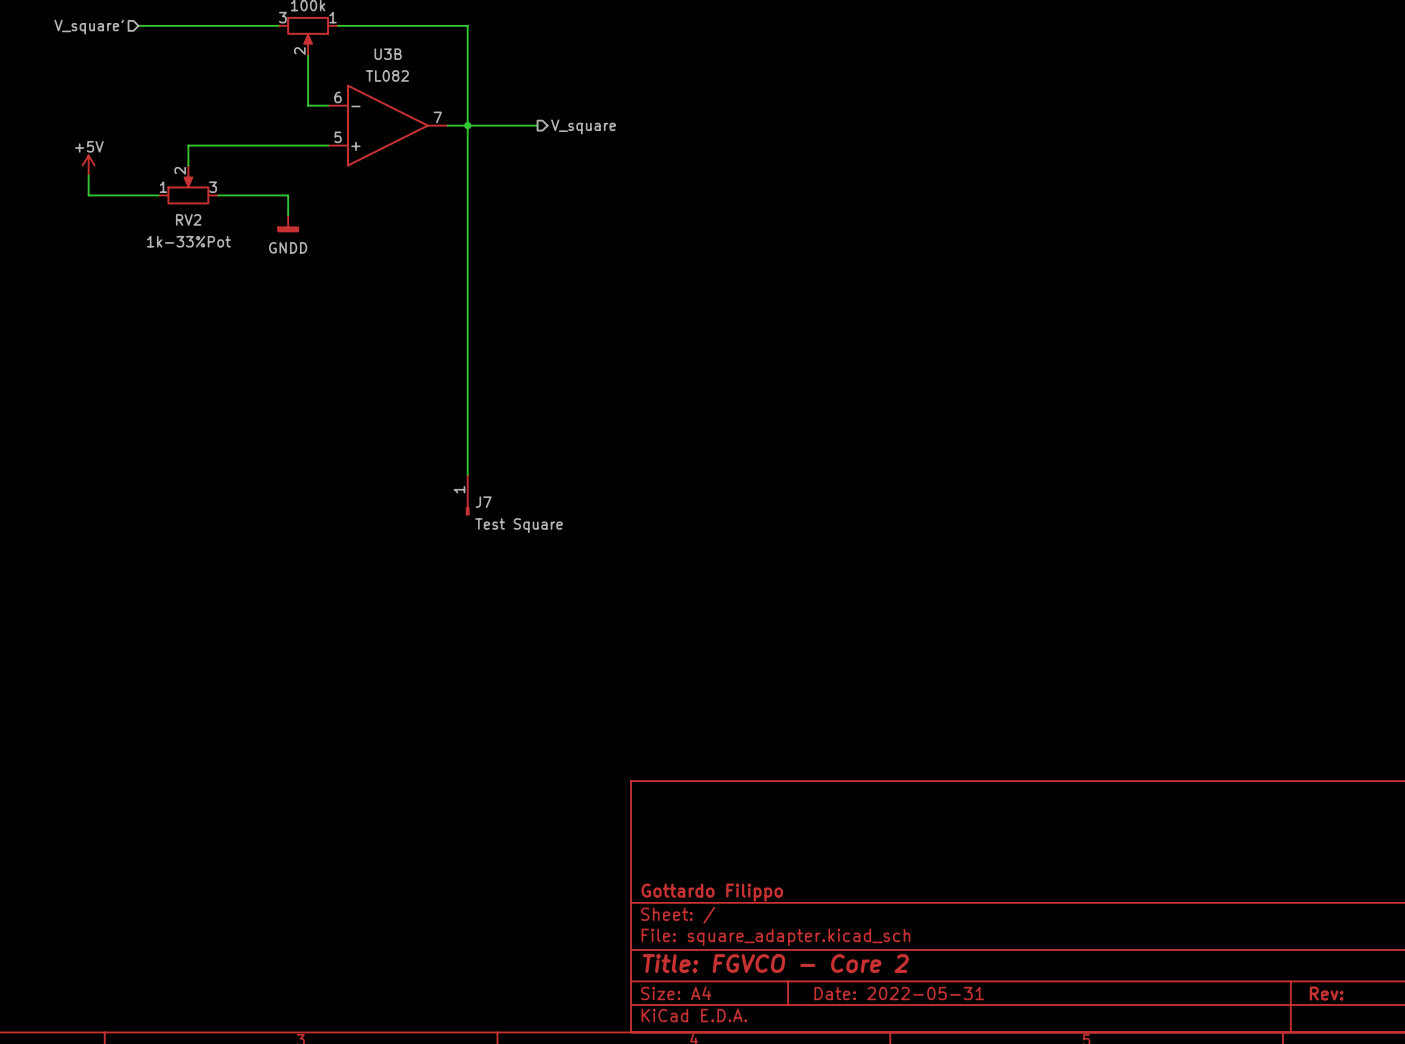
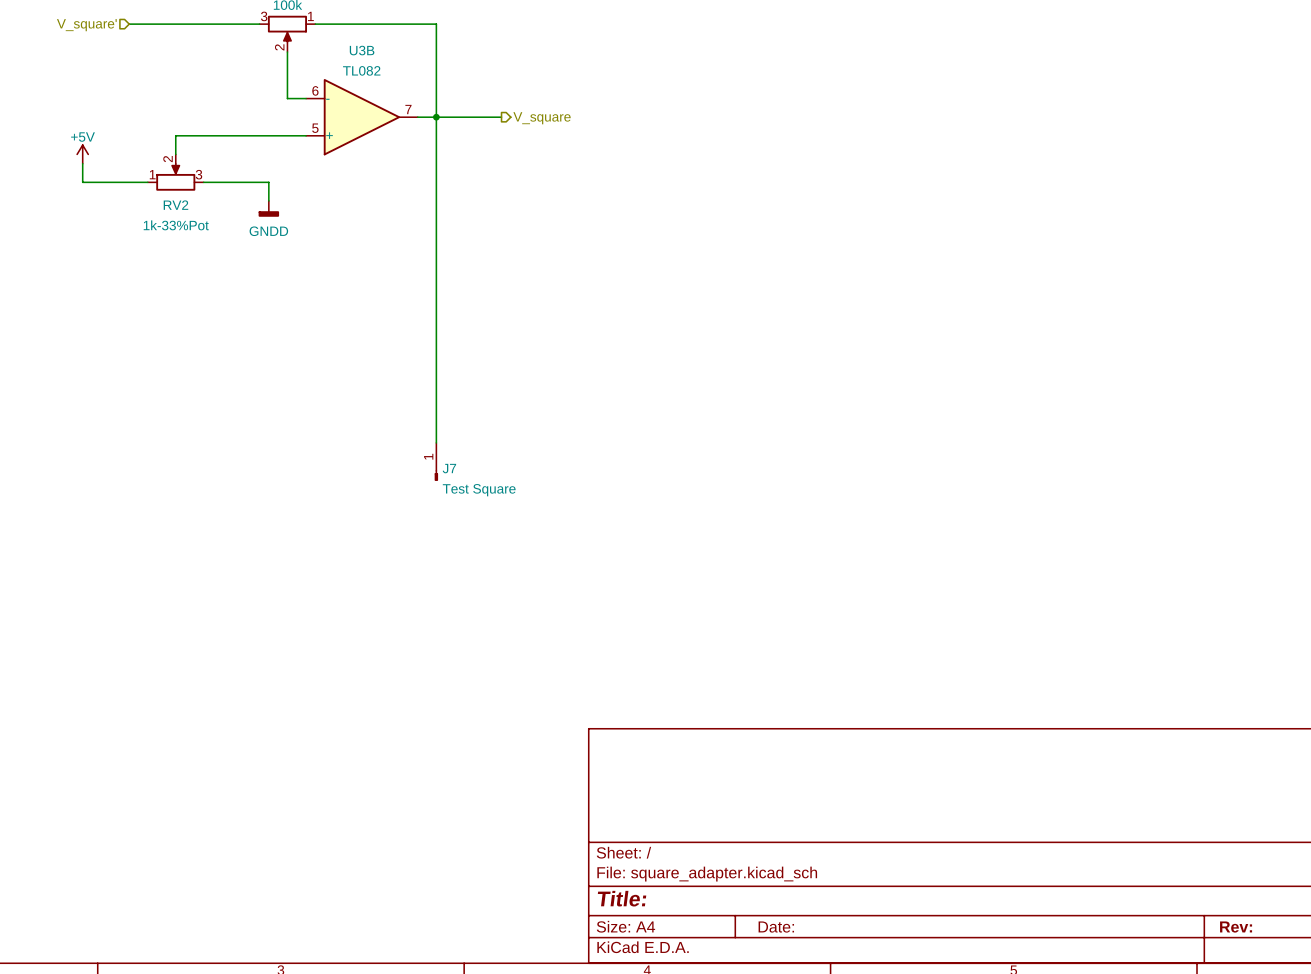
title block: Gottardo Filippo (712, 892) -> none
title block: Title: FGVCO - Core 2 (775, 963) -> Title: (622, 898)
title block: Date: 2022-05-31 (899, 993) -> Date: (776, 927)

